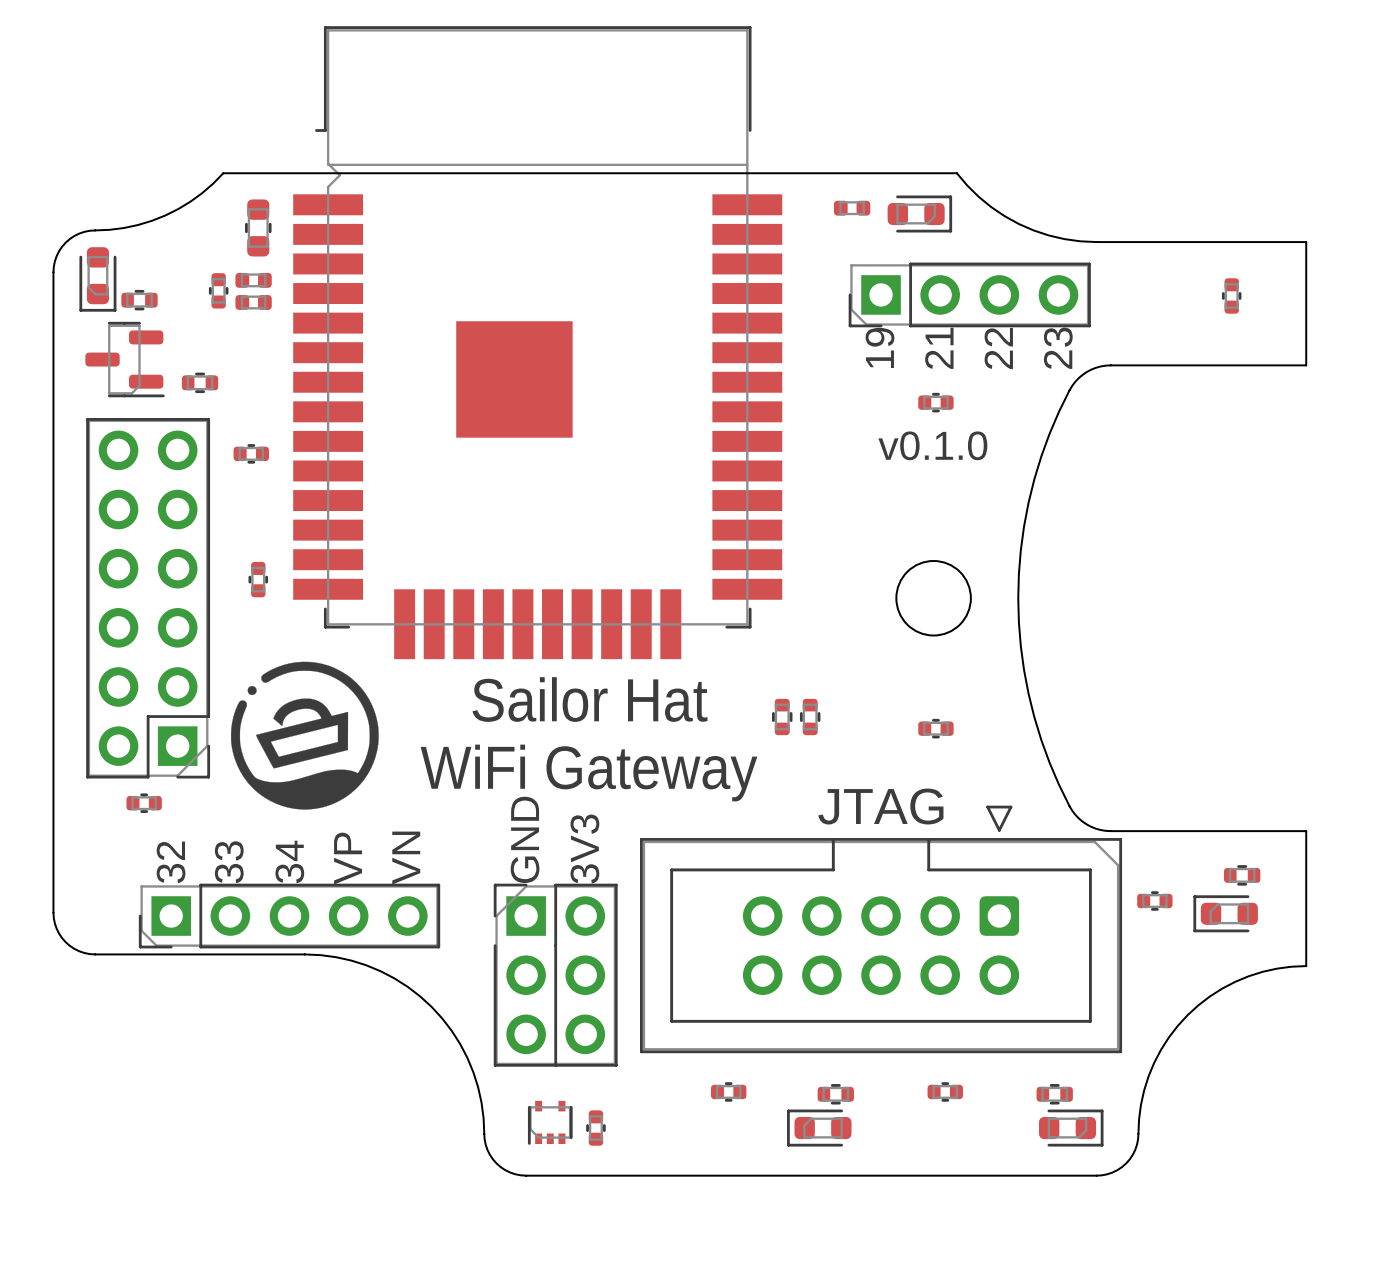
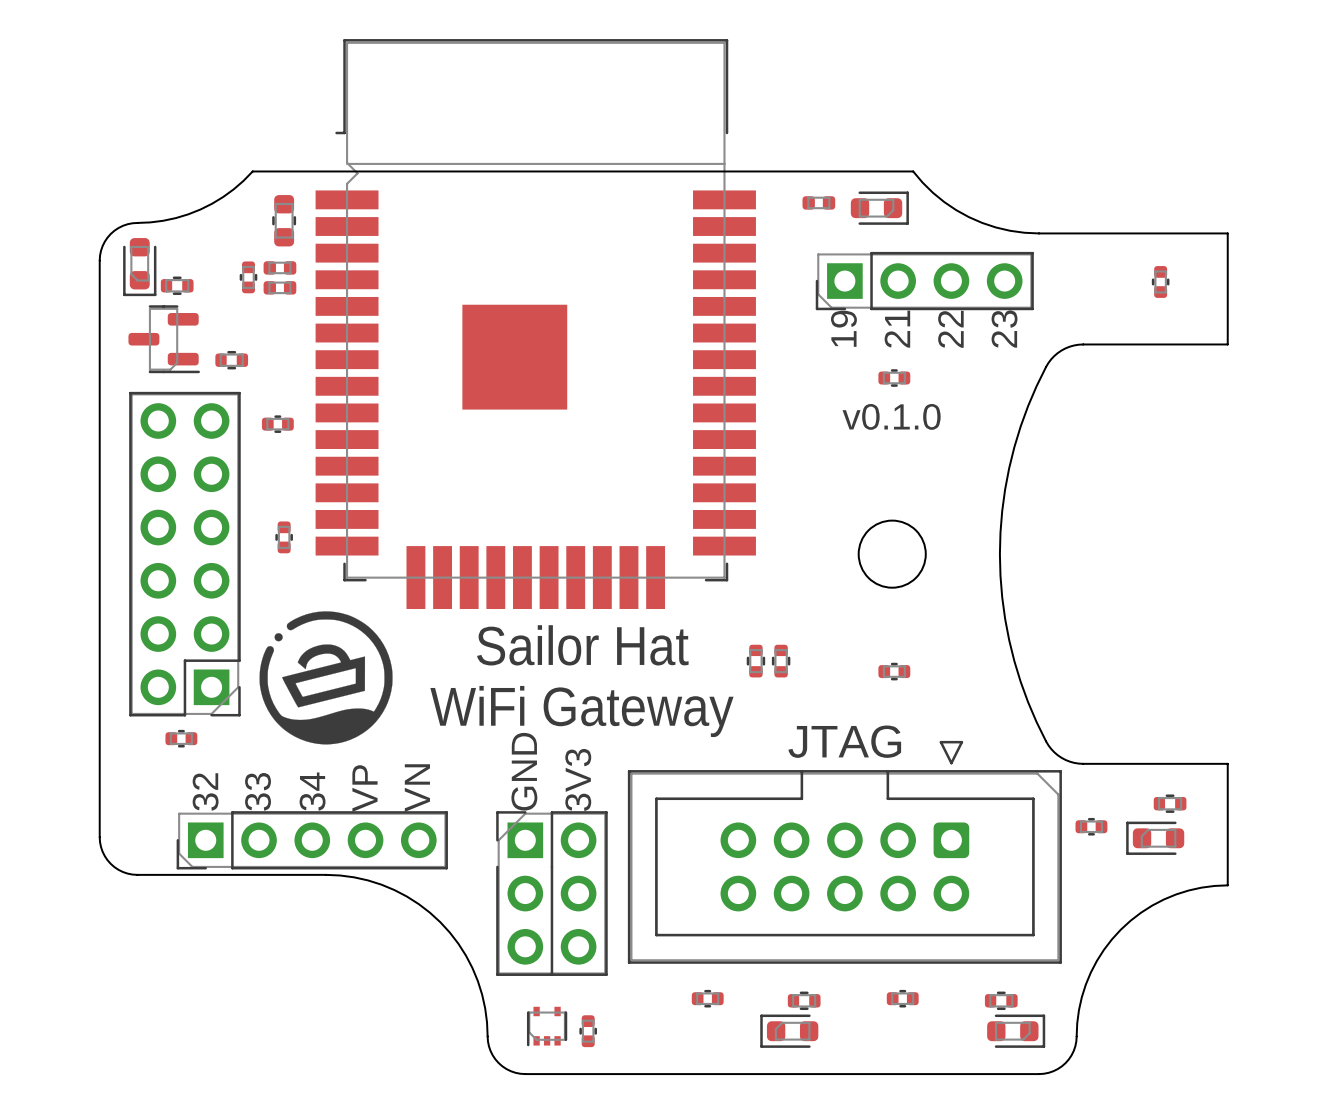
board edge: (1145, 365) (1110, 365) (1095, 367) (1078, 378) (1069, 390) (1049, 433) (1028, 502) (1020, 550) (1018, 598) (1020, 646) (1028, 693) (1041, 739) (1069, 806) (1082, 821) (1095, 828) (1110, 831) (1145, 831) -> (1083, 344) (1065, 348) (1051, 359) (1028, 406) (1009, 468) (1002, 510) (999, 554) (1002, 597) (1009, 640) (1028, 702) (1051, 748) (1065, 759) (1083, 763)

